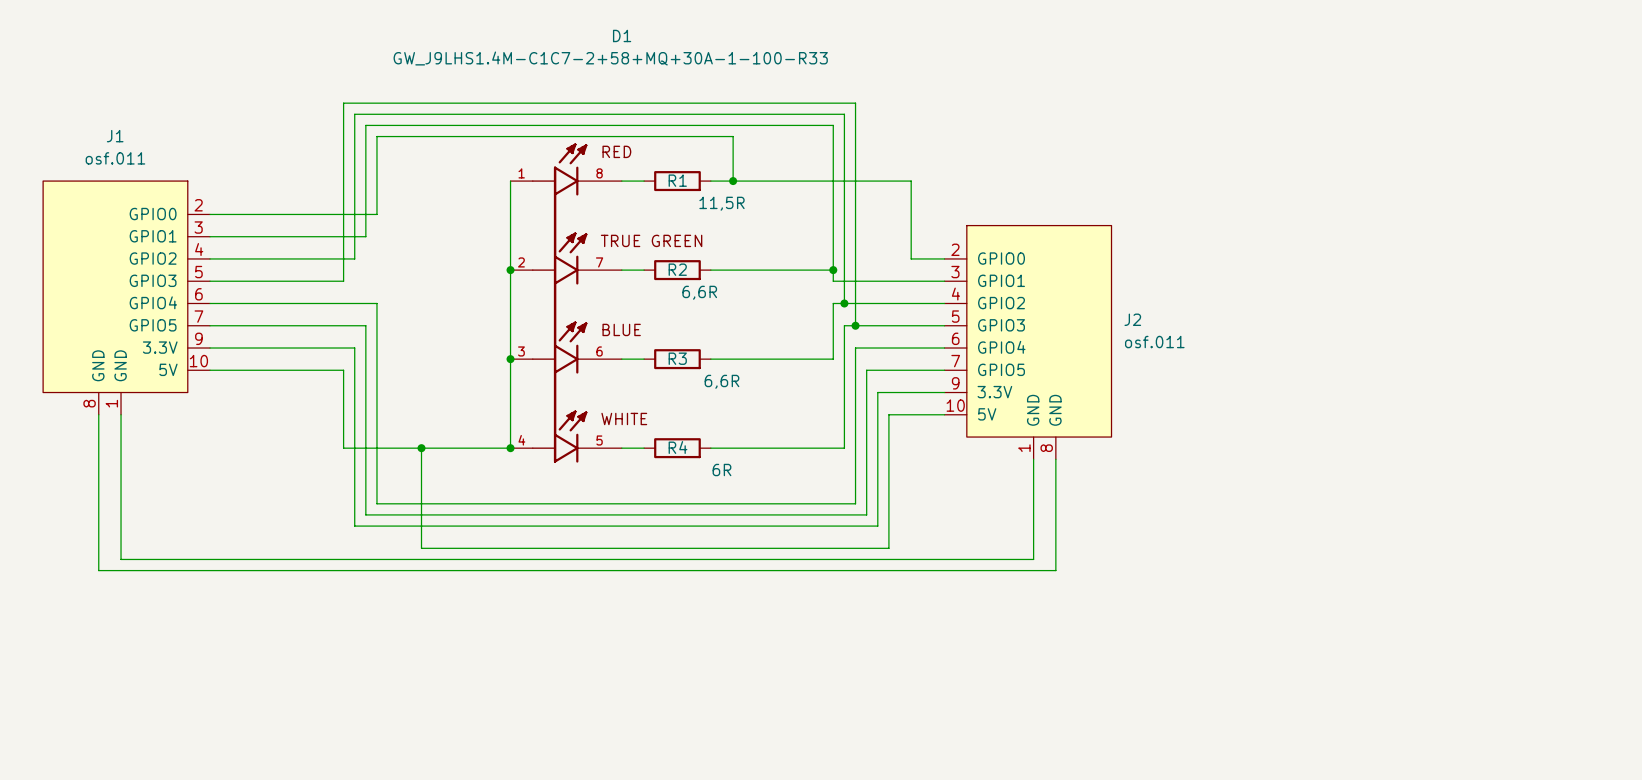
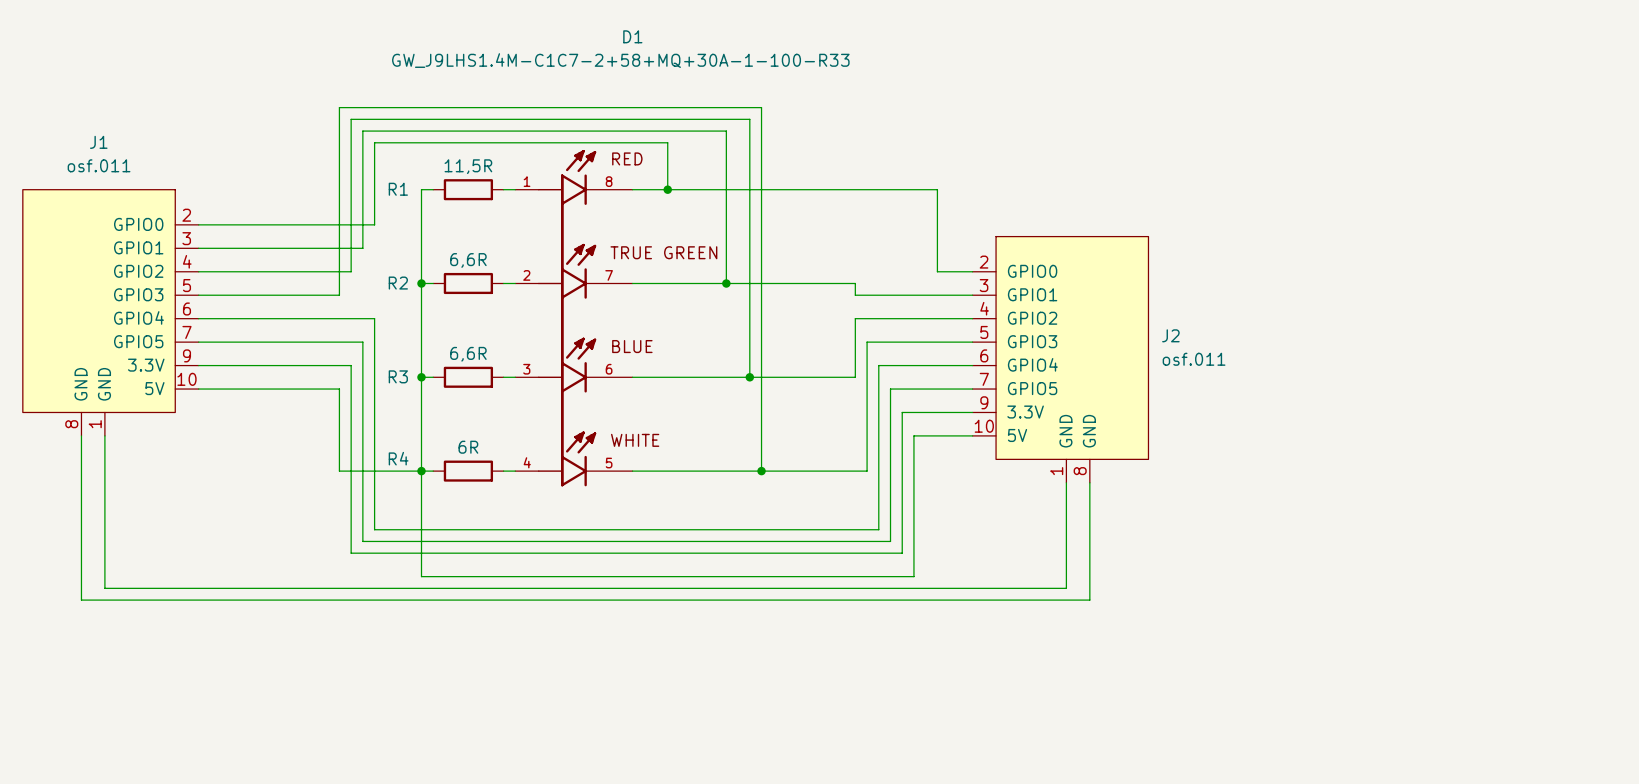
wire: (744, 103) (855, 103) (855, 325) -> (761, 107) (761, 471)
wire: (733, 114) (844, 114) (844, 303) -> none
wire: (710, 125) (833, 125) (833, 270) -> (726, 131) (726, 283) (656, 283)
wire: (655, 136) (733, 136) -> (749, 119) (749, 142)
wire: none -> (667, 142) (667, 189)
R1 name position: R1 (677, 180) -> R1 (398, 189)
wire: none -> (433, 189) (421, 189) (421, 471)
wire: (510, 181) (510, 448) -> (515, 189) (503, 189)
wire: none -> (656, 189) (726, 189)
junction: none -> (667, 189)
R1 position: (677, 181) -> (468, 189)
wire: none -> (749, 189) (749, 377)
junction: (733, 181) -> none
R1 value position: 11,5R (721, 203) -> 11,5R (468, 166)
R2 name position: R2 (677, 269) -> R2 (398, 283)
wire: none -> (421, 283) (433, 283)
junction: none -> (421, 283)
wire: none -> (503, 283) (515, 283)
junction: (510, 270) -> none
R2 position: (677, 270) -> (468, 283)
junction: none -> (726, 283)
junction: (833, 270) -> none
R2 value position: 6,6R (699, 292) -> 6,6R (468, 260)
junction: (844, 303) -> none
junction: (855, 325) -> none
R3 name position: R3 (677, 358) -> R3 (398, 376)
wire: none -> (421, 377) (433, 377)
junction: none -> (421, 377)
wire: none -> (503, 377) (515, 377)
junction: (510, 359) -> none
wire: none -> (656, 377) (726, 377)
R3 position: (677, 359) -> (468, 377)
junction: none -> (749, 377)
R3 value position: 6,6R (721, 381) -> 6,6R (468, 354)
R4 name position: R4 (678, 447) -> R4 (398, 458)
wire: (432, 448) (499, 448) -> (656, 471) (726, 471)
junction: (510, 448) -> none
R4 position: (677, 448) -> (468, 471)
junction: none -> (761, 471)
R4 value position: 6R (721, 470) -> 6R (468, 447)

